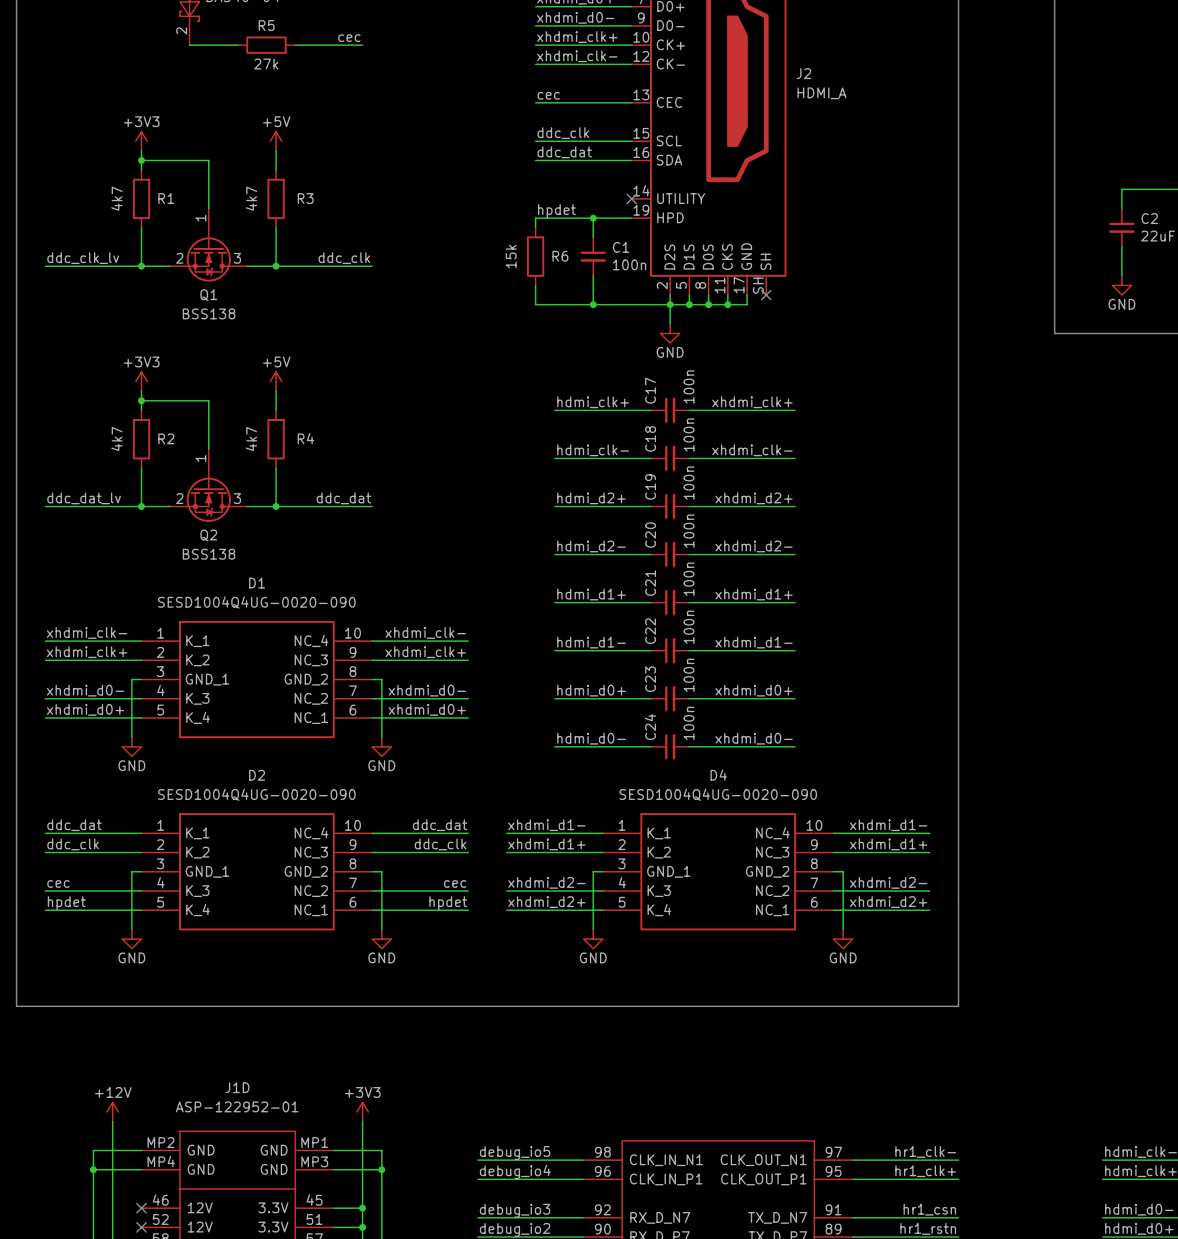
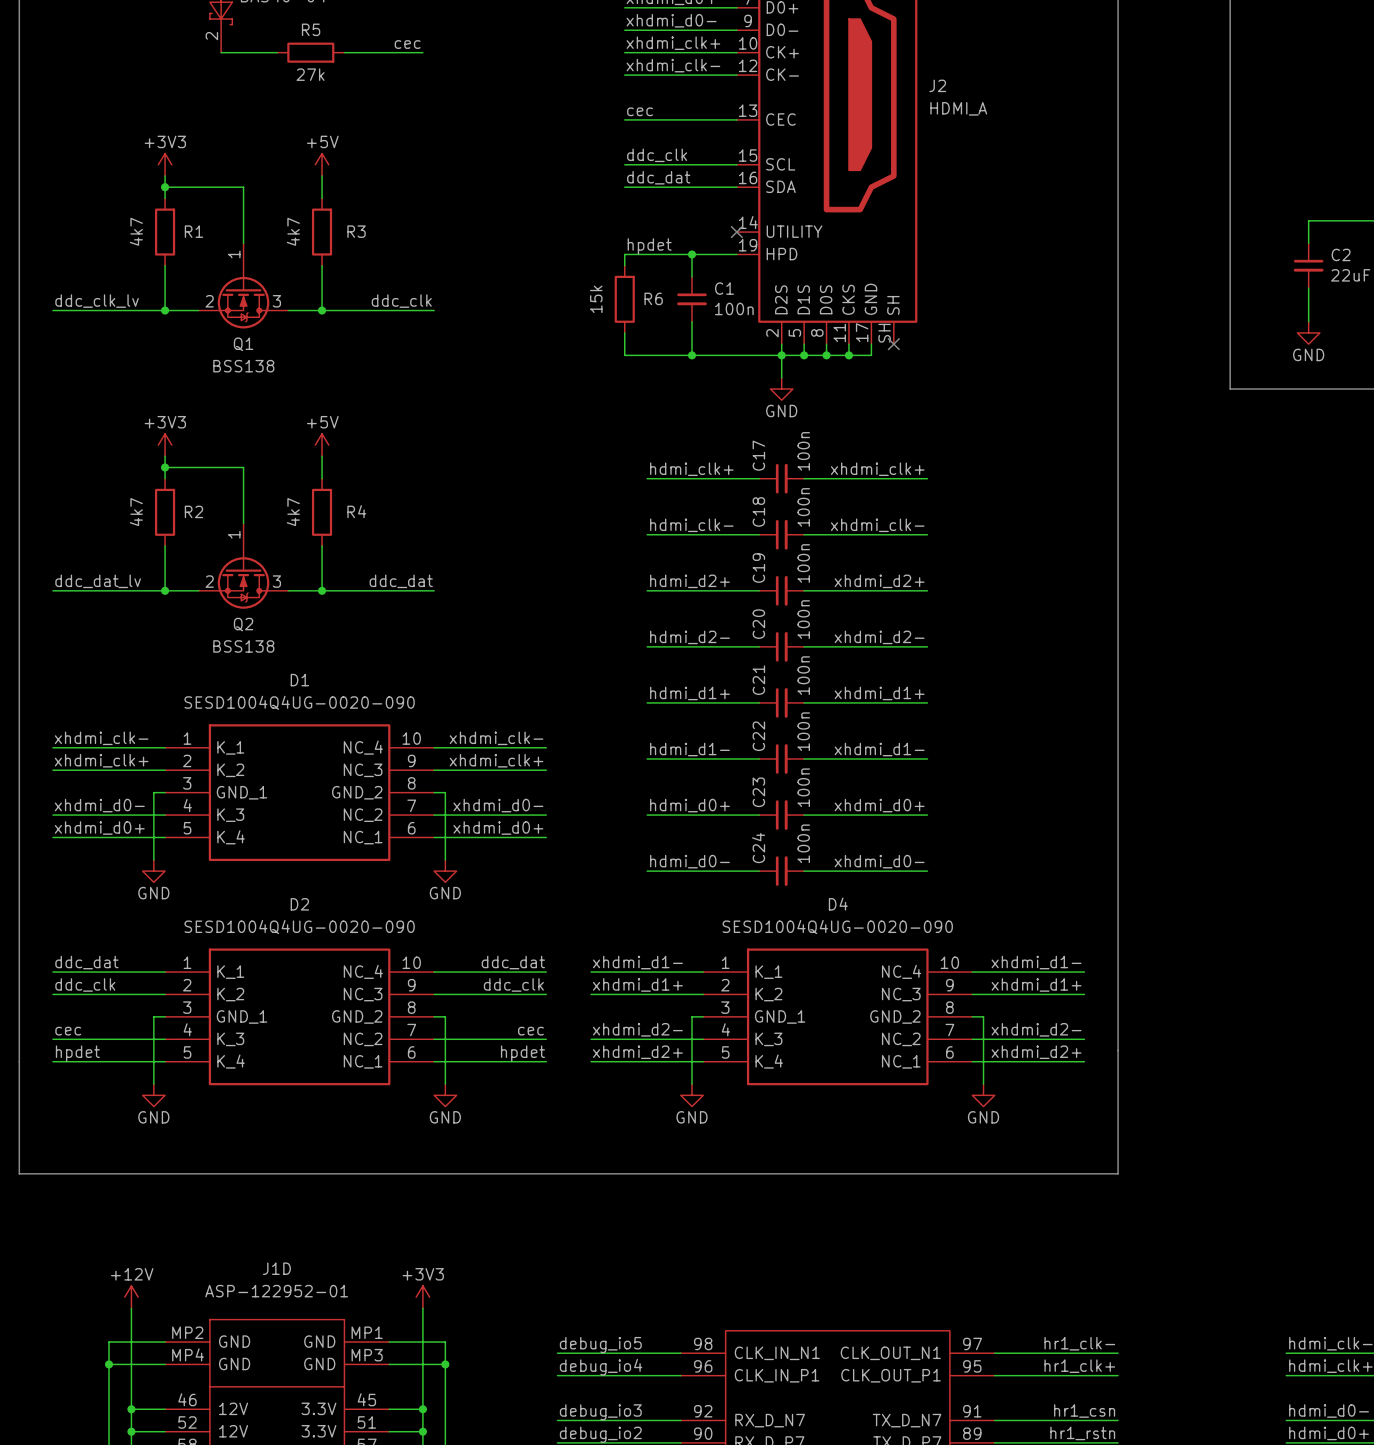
wire: none -> (131, 1409) (165, 1409)
junction: none -> (131, 1409)
no-connect mark: (141, 1208) -> none
wire: none -> (131, 1431) (165, 1431)
junction: none -> (131, 1431)
no-connect mark: (141, 1227) -> none

